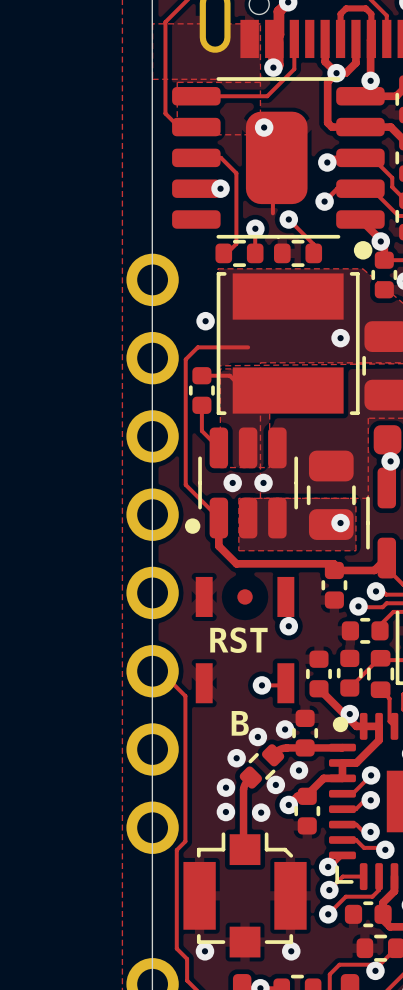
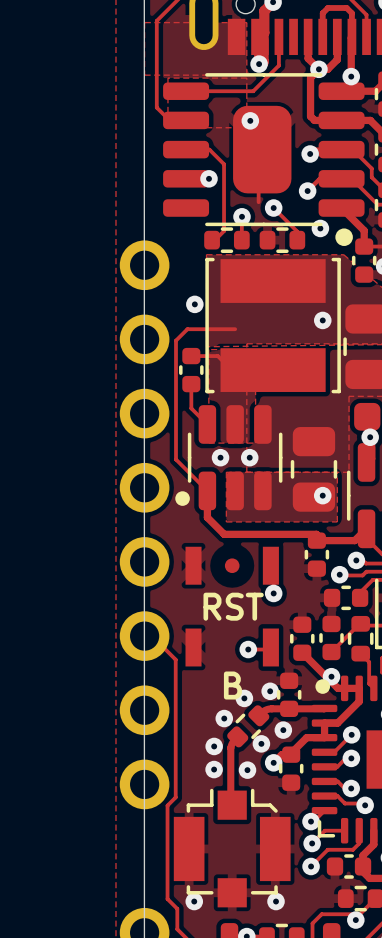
via: none -> (320, 228)
via: (380, 241) -> none

